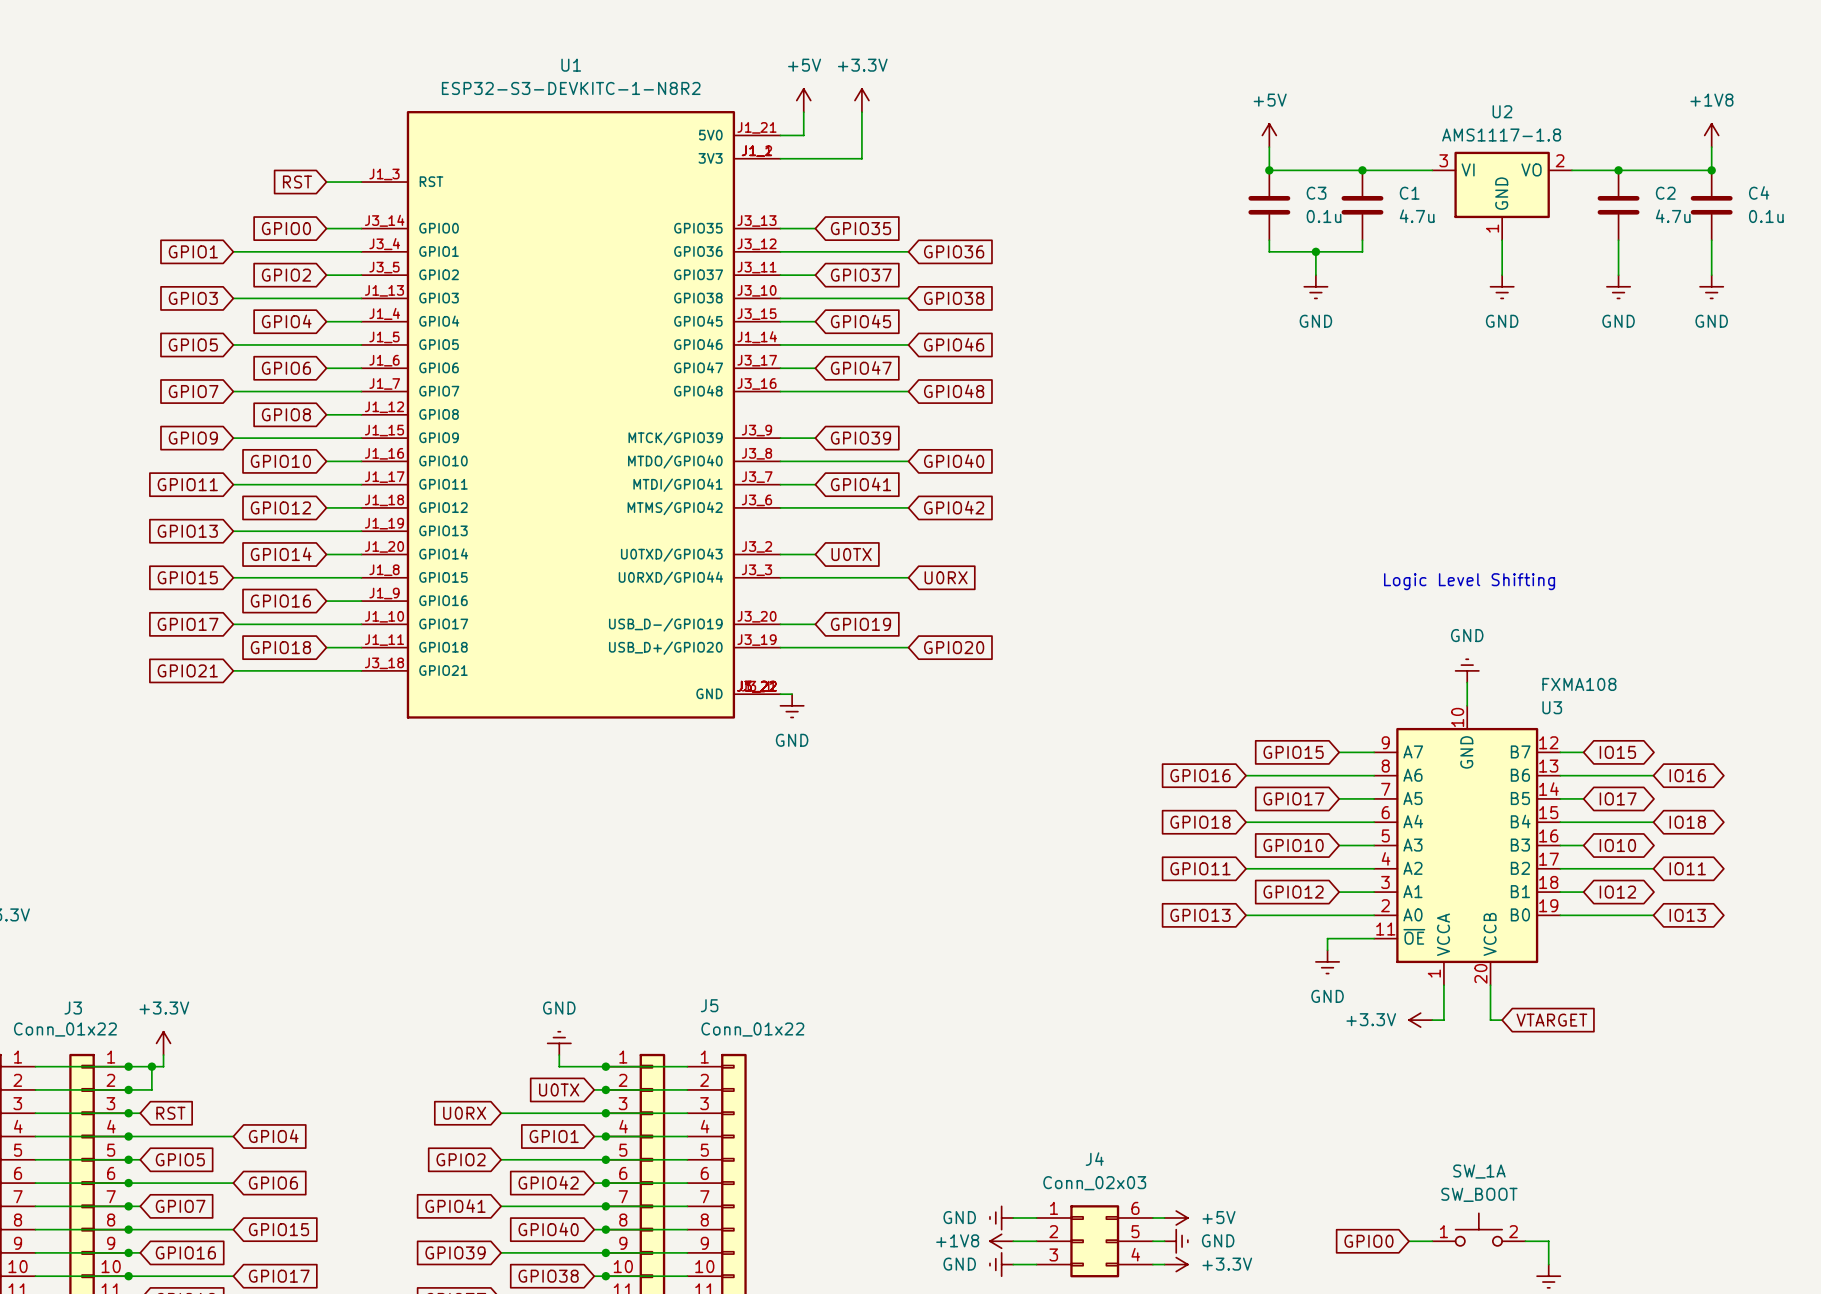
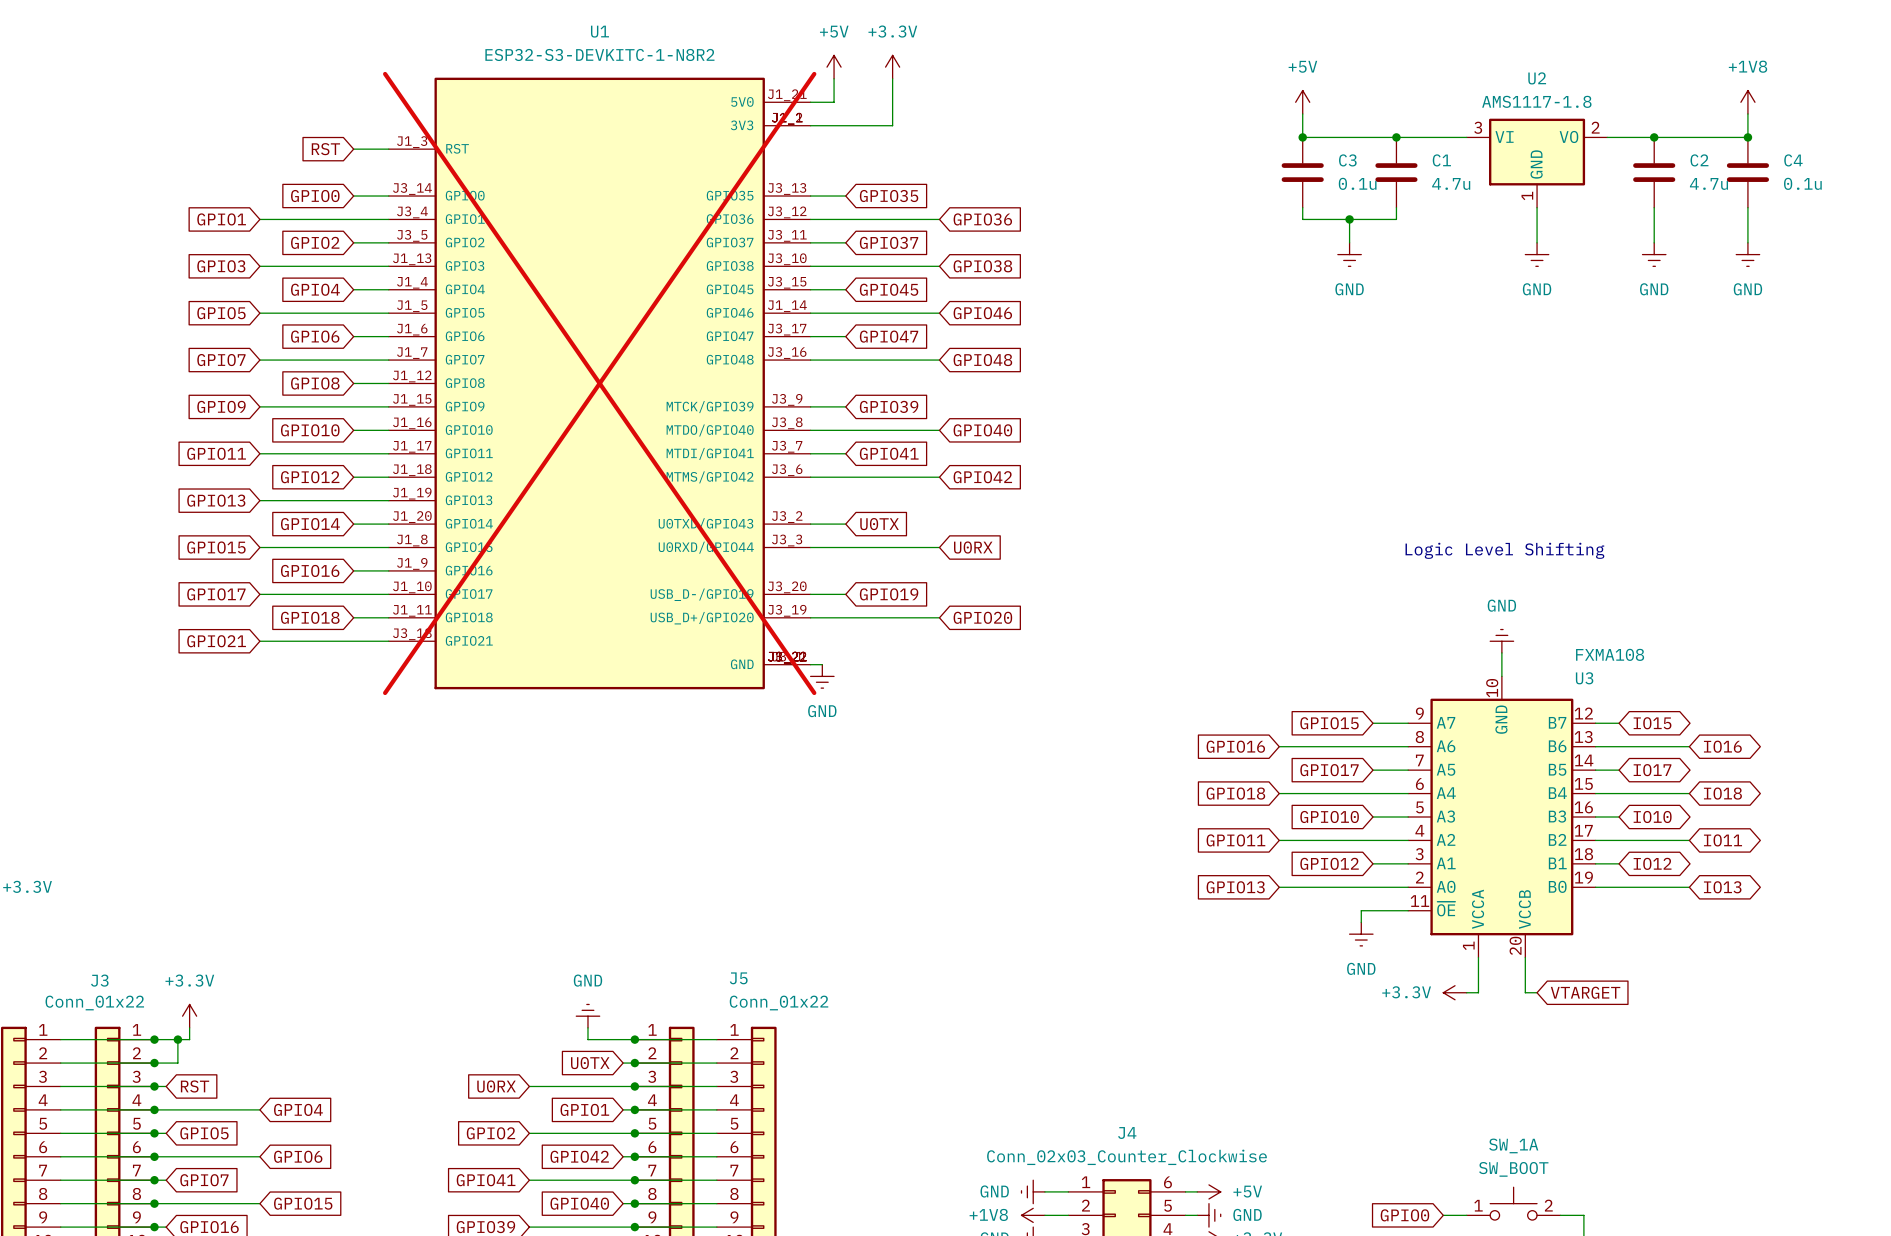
U1 do-not-place cross: none -> (599, 383)
J4 value: Conn_02x03 (1094, 1183) -> Conn_02x03_Counter_Clockwise (1126, 1157)

